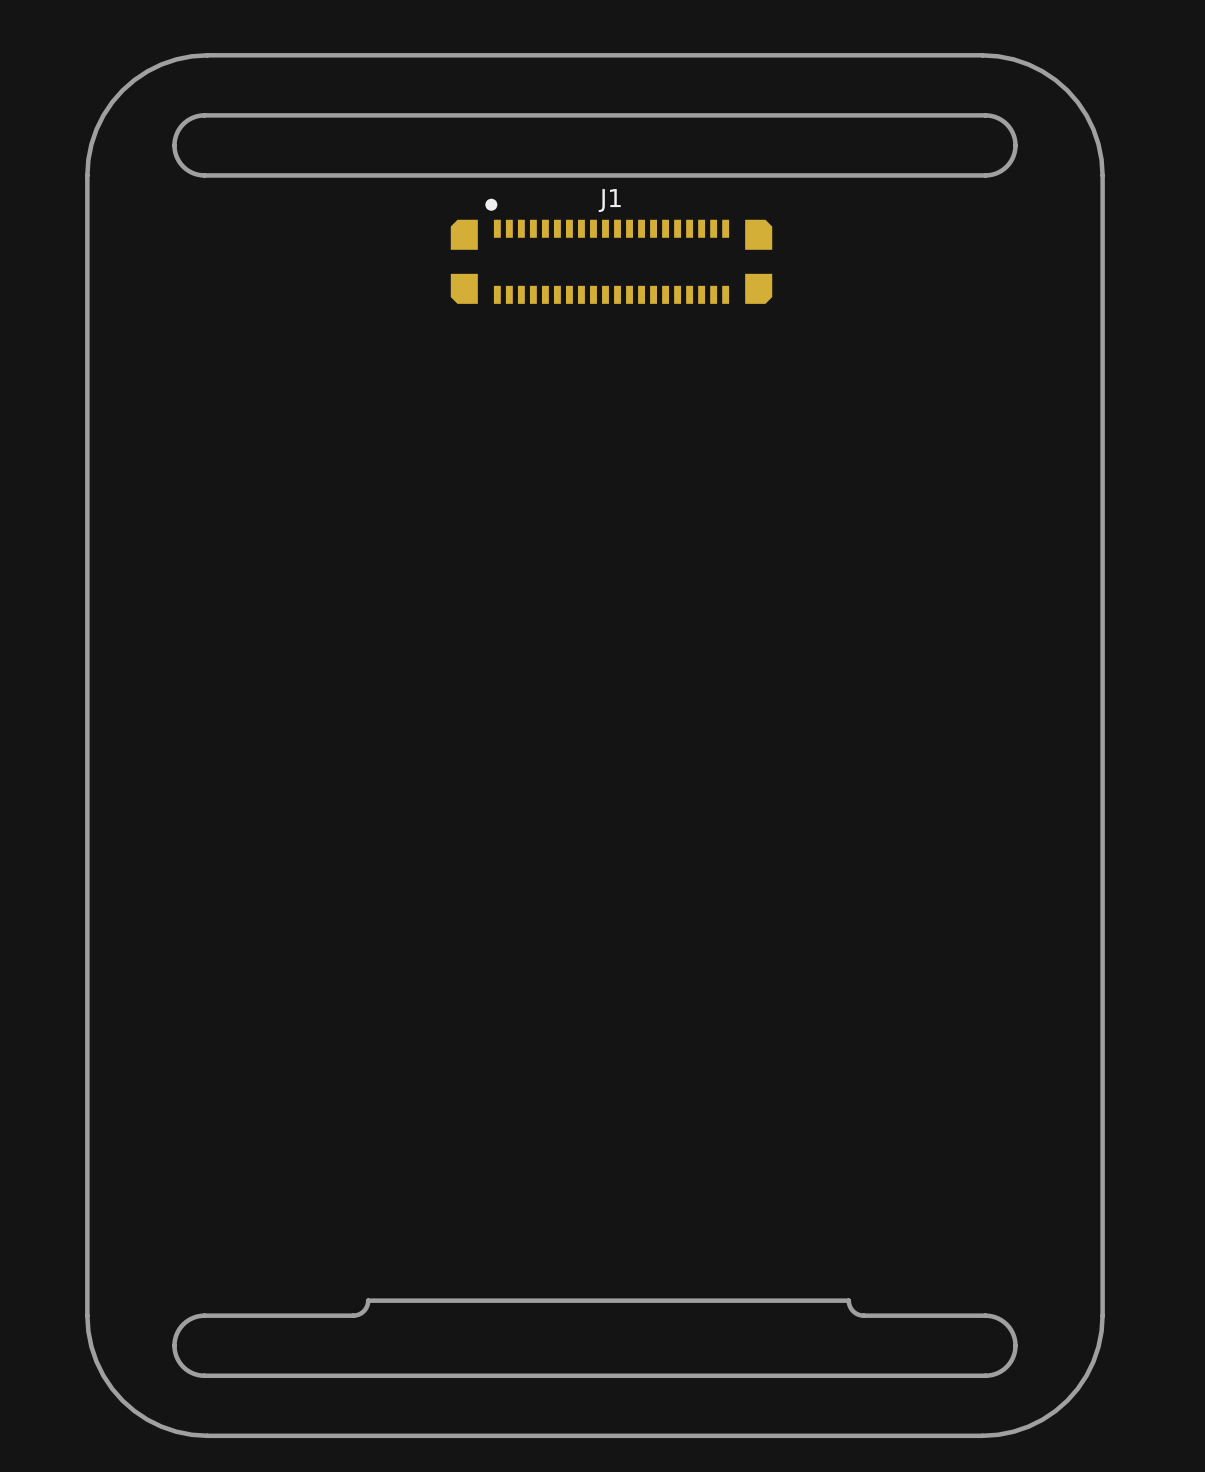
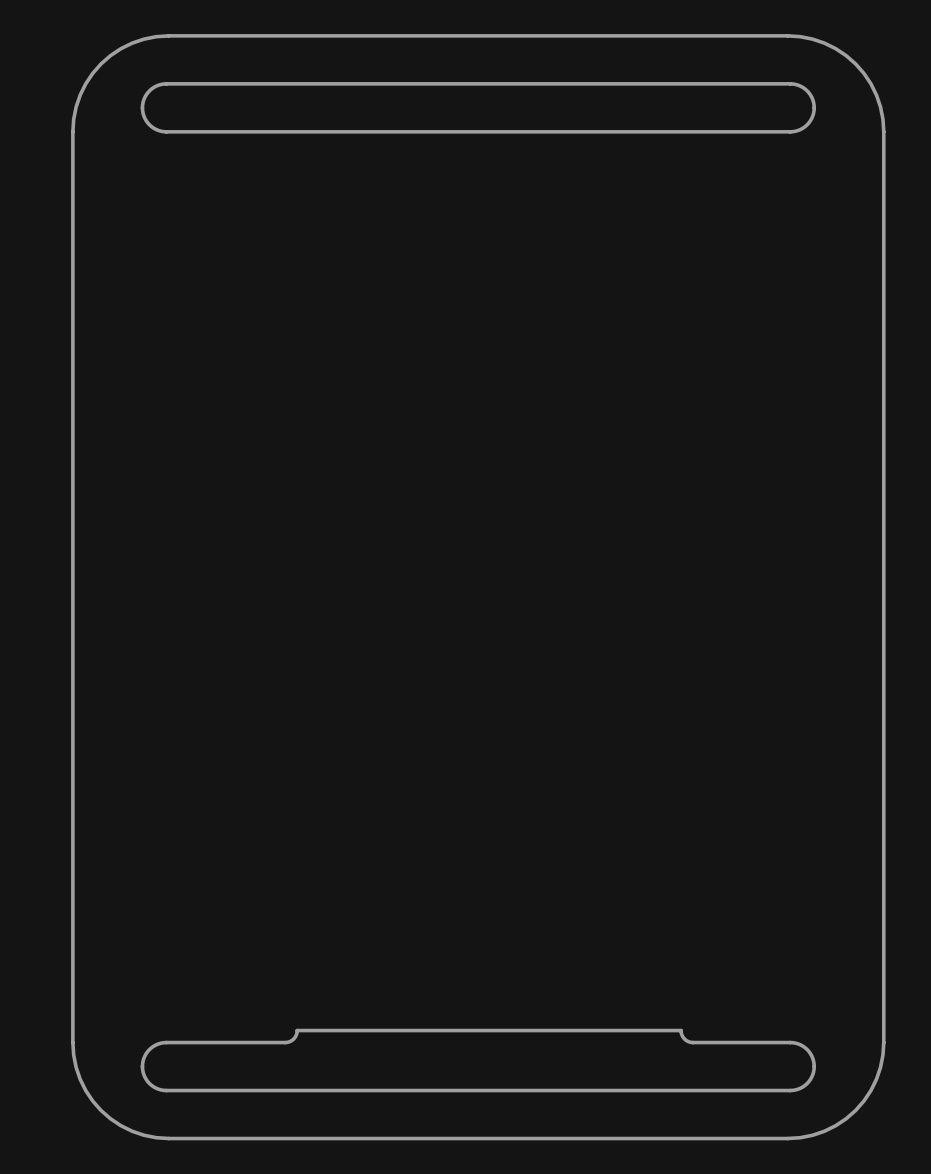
J1: (611, 251) -> none

